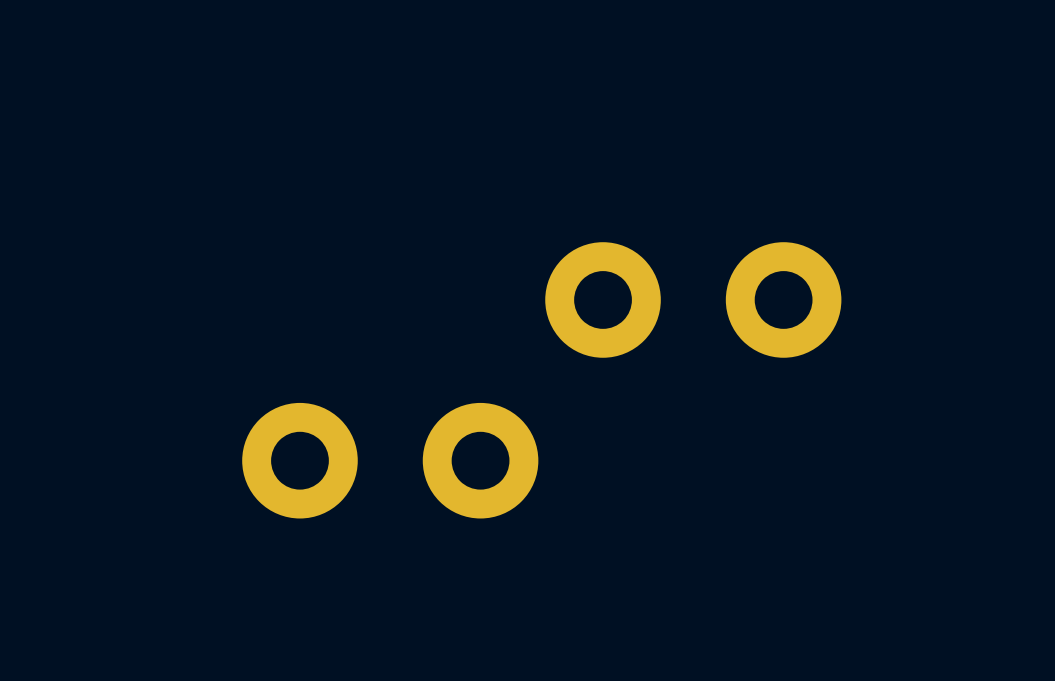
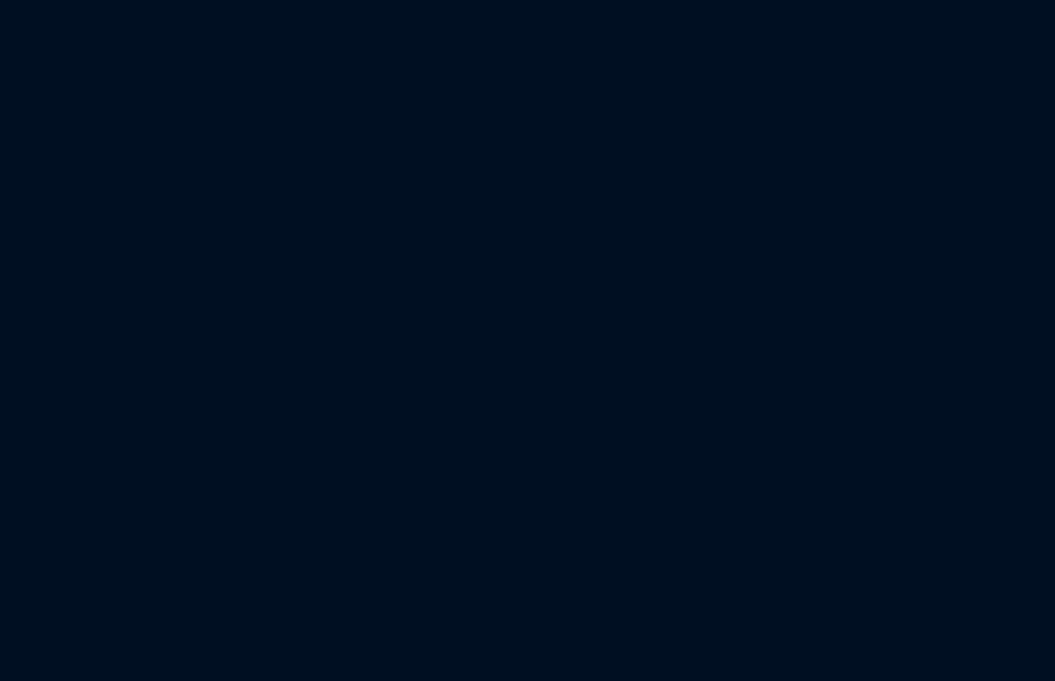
part: (693, 299) -> none
part: (390, 460) -> none

